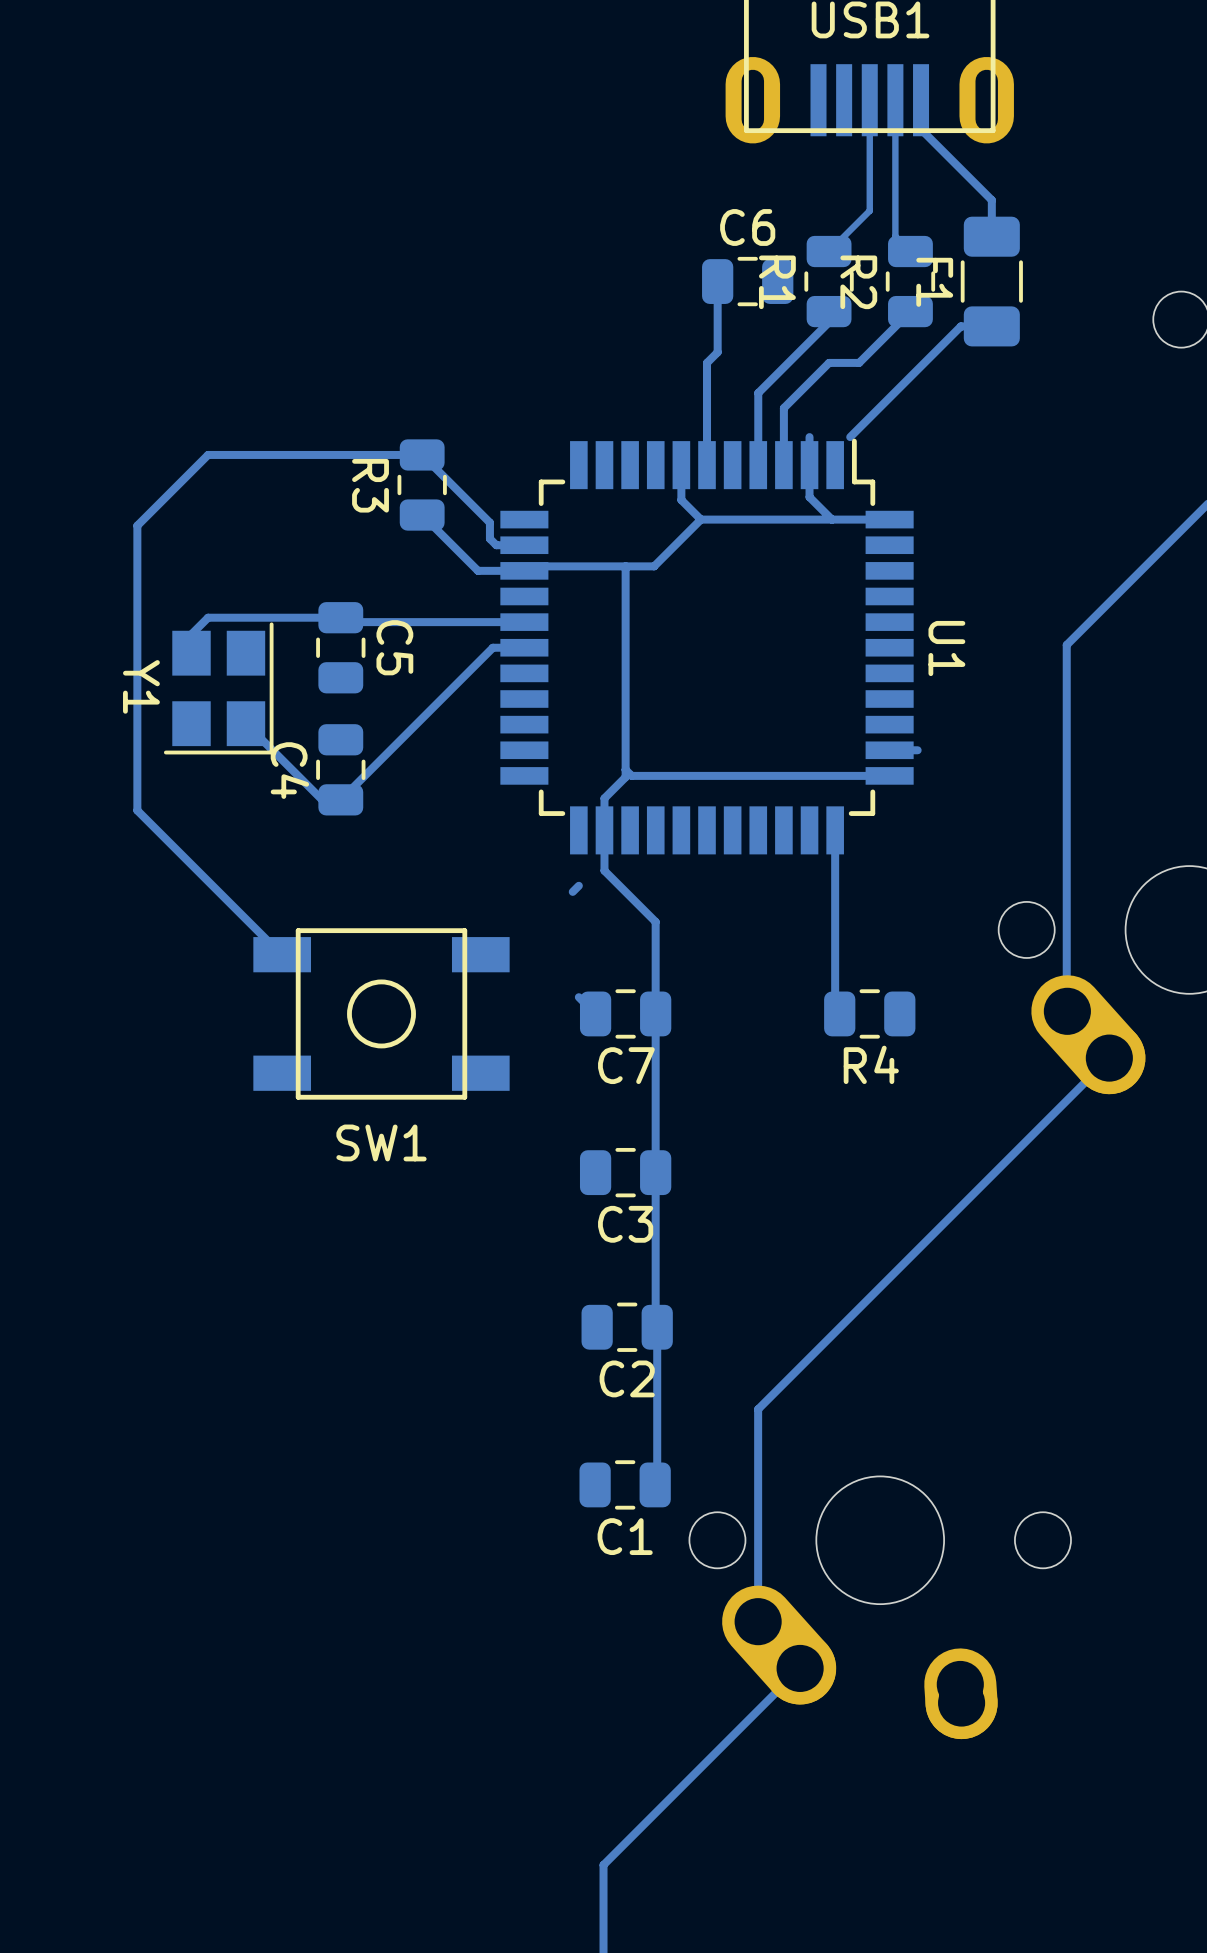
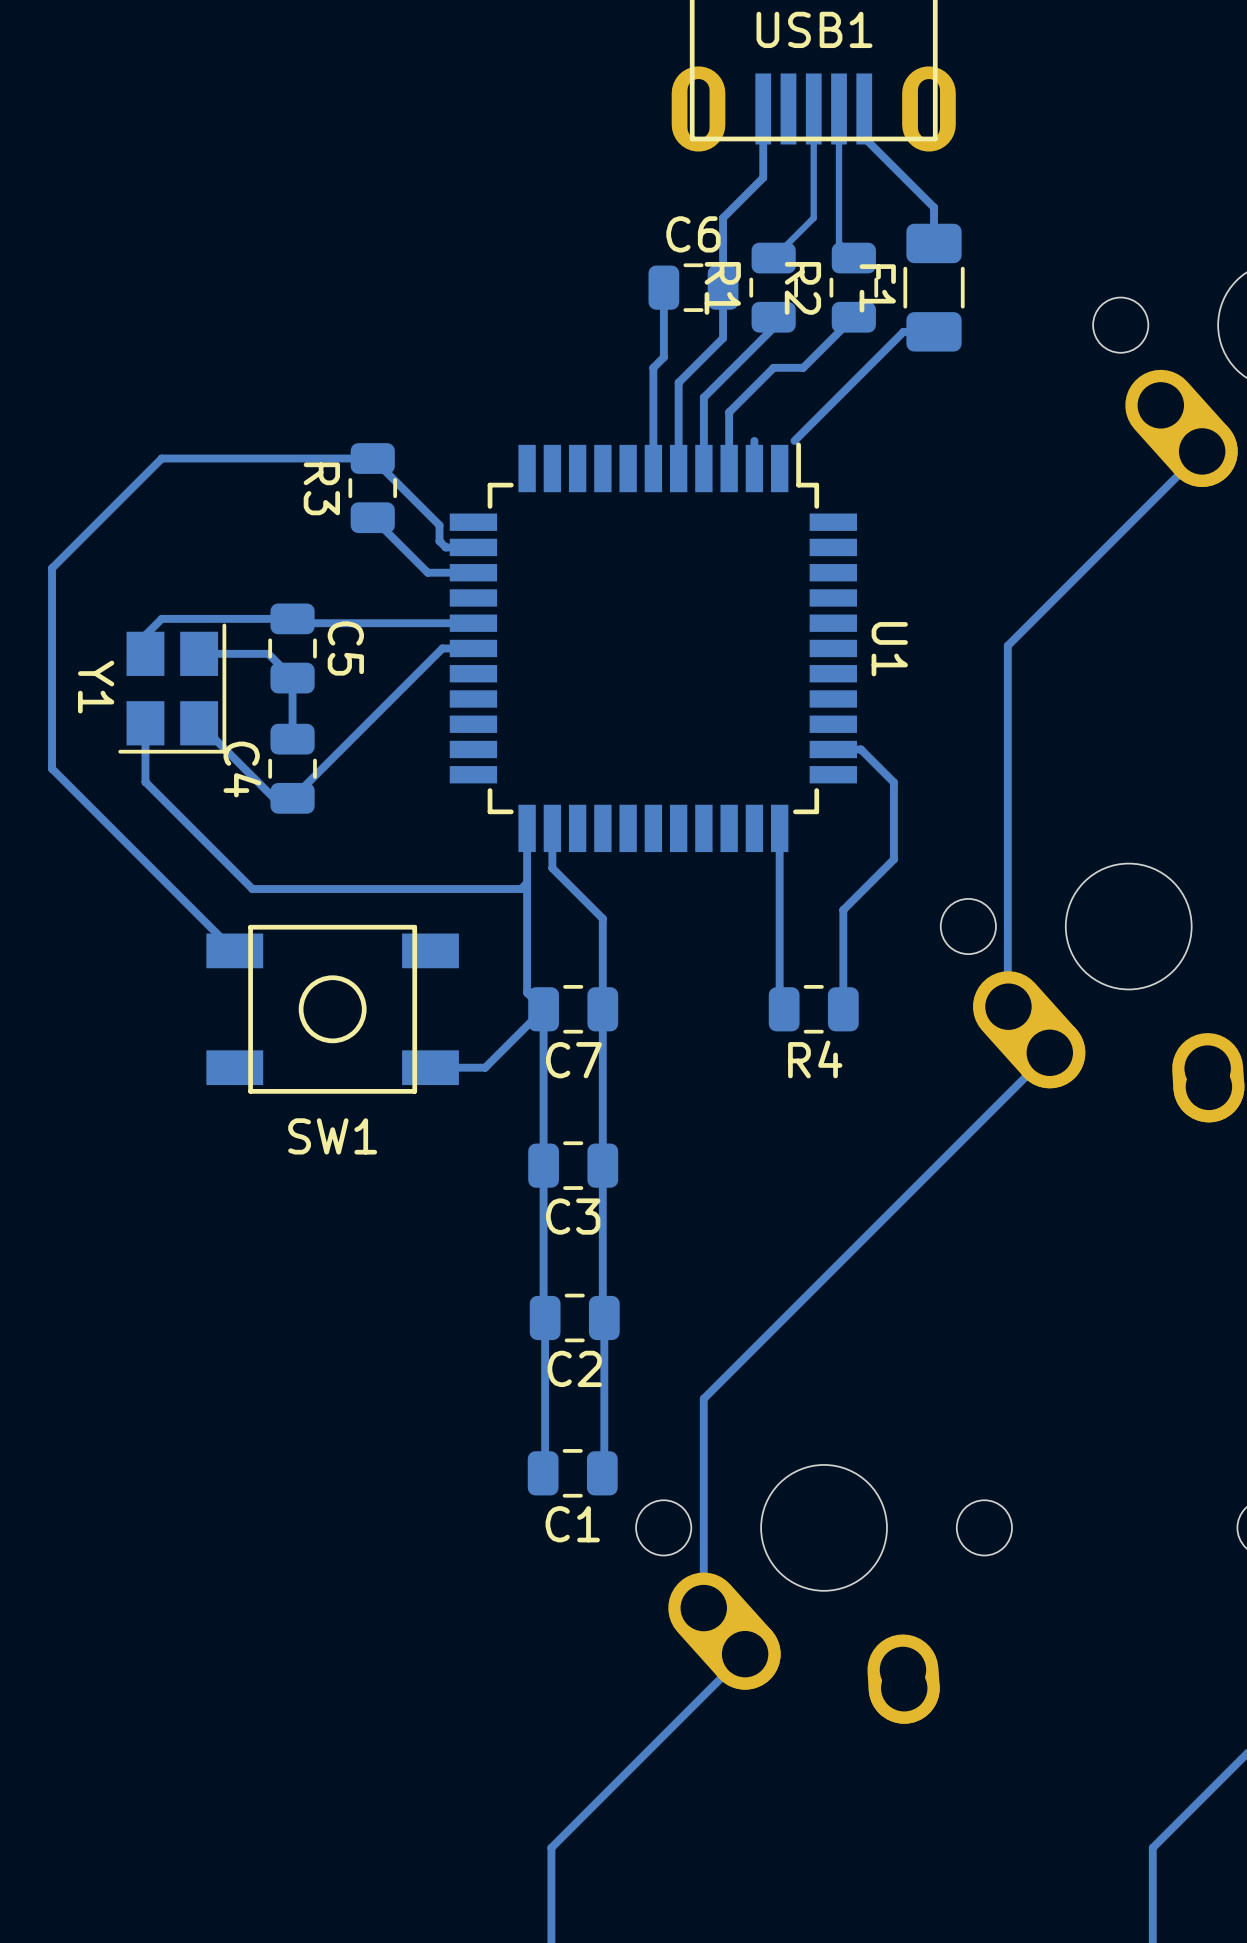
track: none -> (763, 108) (763, 177) (723, 217) (723, 338) (678, 382) (678, 468)
track: (681, 465) (681, 500) (700, 519) -> none
track: (809, 465) (809, 497) (831, 519) -> none
track: (700, 519) (654, 566) (544, 566) -> none
track: (889, 519) (700, 519) -> none
track: (137, 525) (137, 810) -> (92, 528) (52, 568) (52, 768) (92, 808)
track: (625, 566) (625, 777) (604, 798) (604, 830) -> none
track: none -> (199, 653) (268, 653) (292, 678) (292, 739)
track: none -> (145, 723) (145, 782) (252, 889) (521, 889)
track: none -> (860, 749) (893, 782) (893, 859) (843, 910) (843, 1009)
track: (625, 769) (631, 775) (889, 775) -> none
track: none -> (527, 828) (527, 992)
track: none -> (430, 1067) (485, 1067) (543, 1009) (543, 1316)
track: none -> (545, 1317) (545, 1471)

